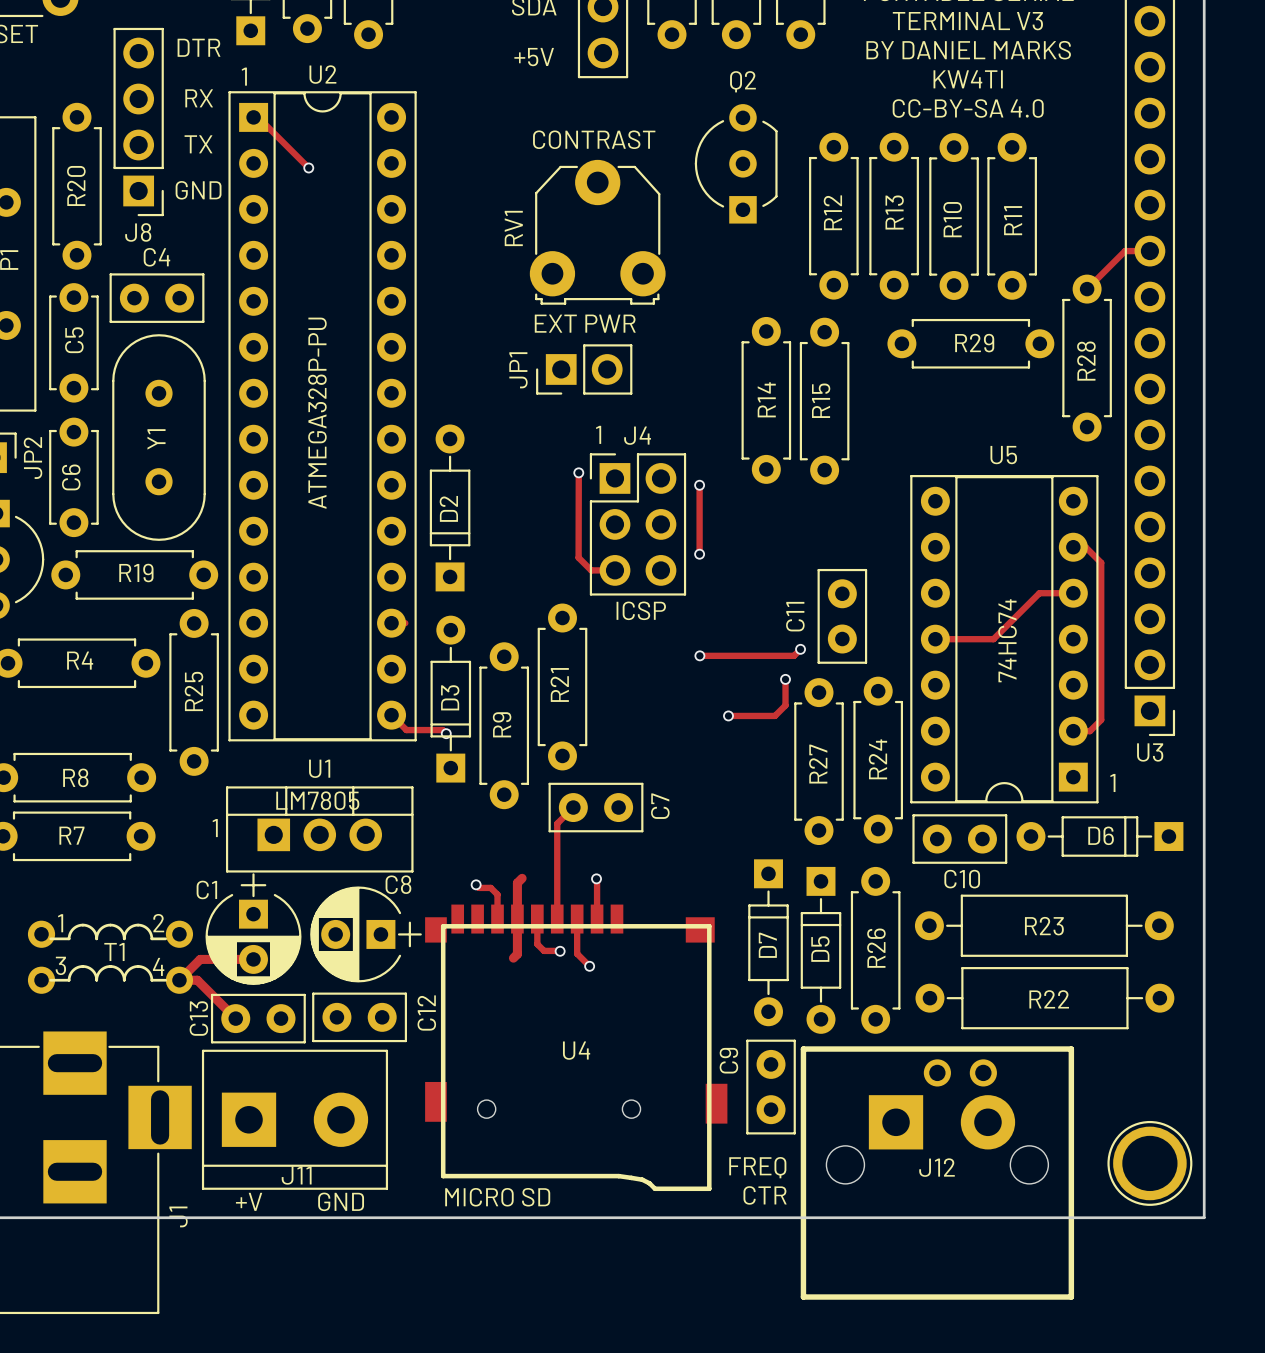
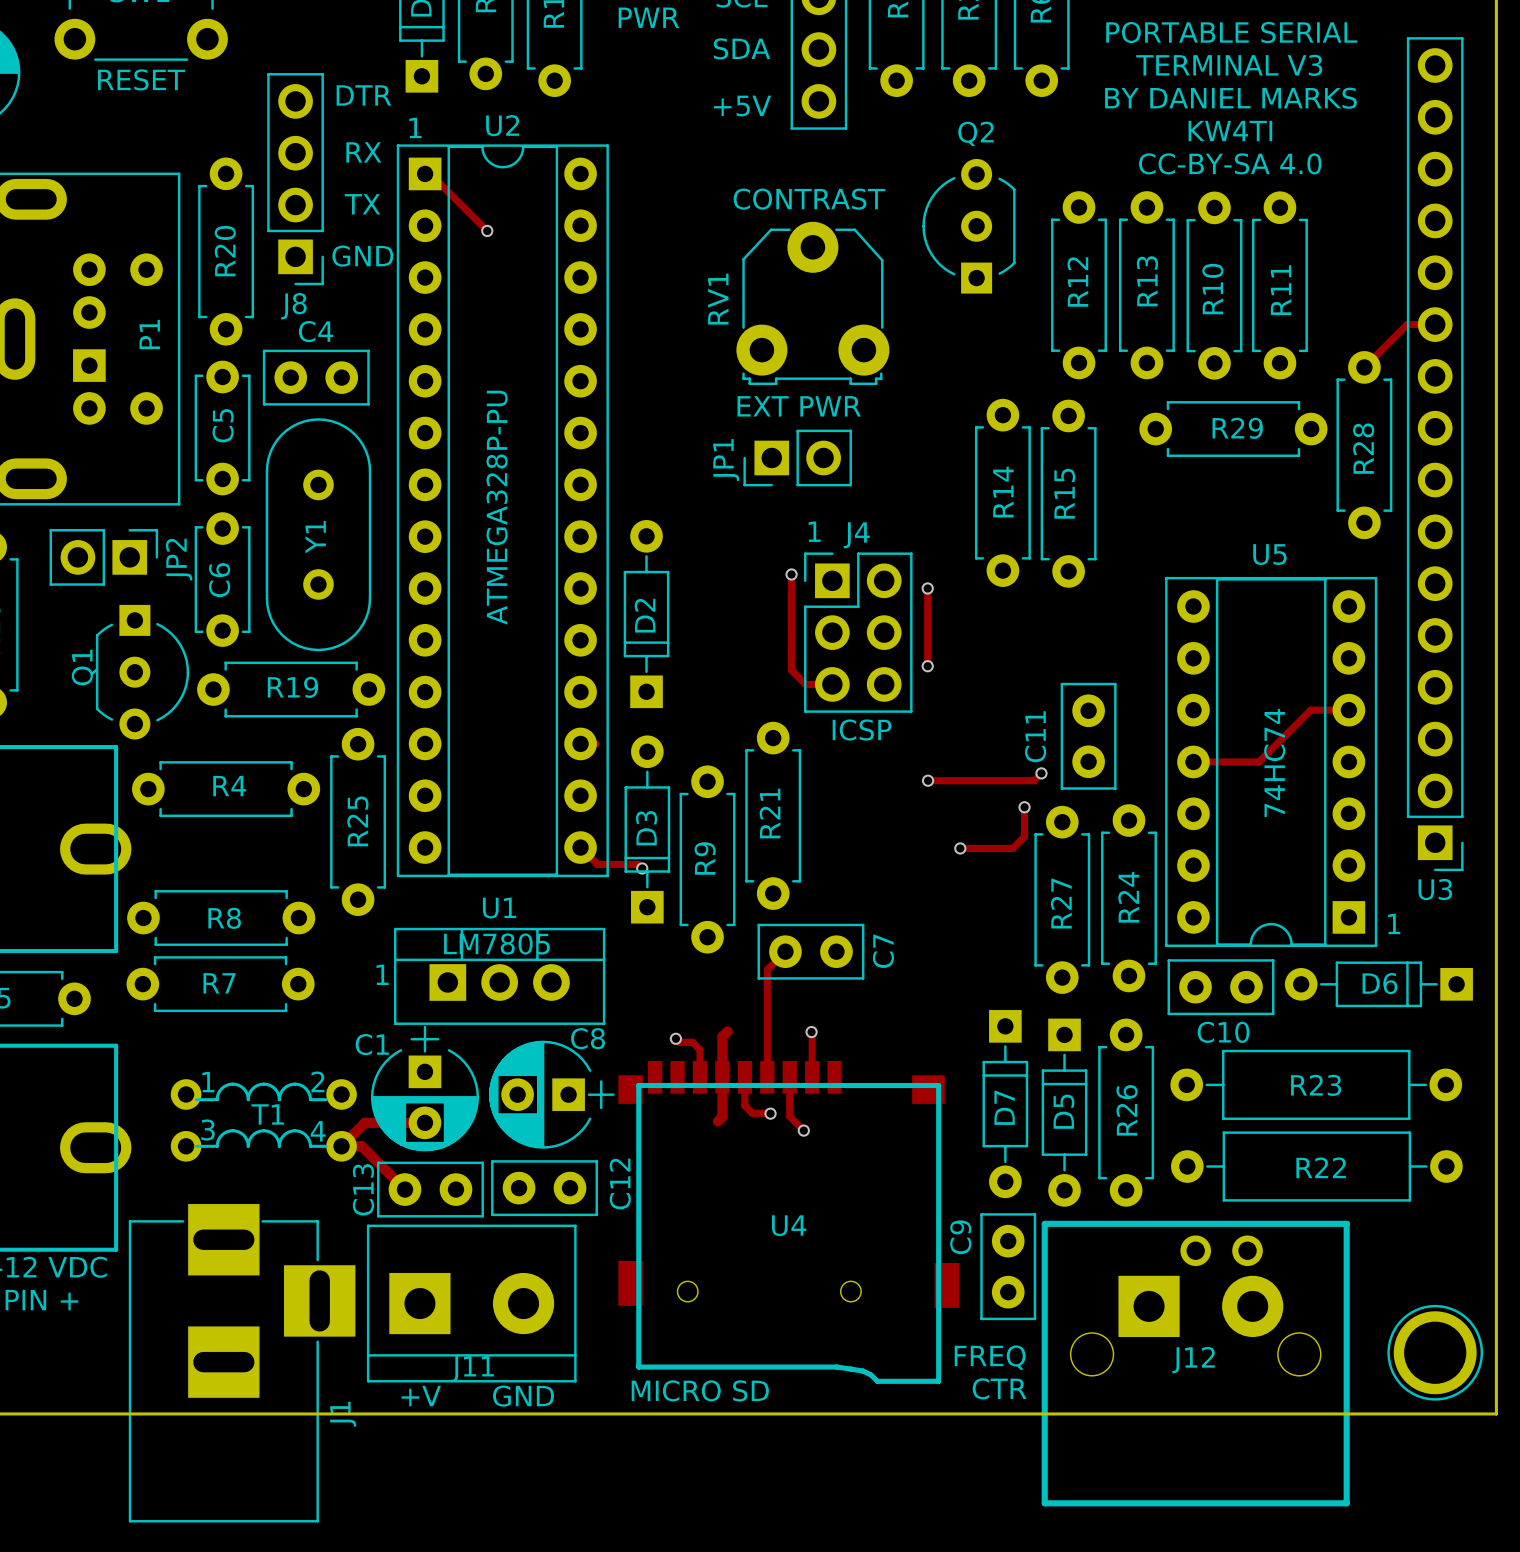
track: (1073, 547) (1085, 547) (1101, 562) (1101, 719) (1089, 731) (1073, 731) -> none

